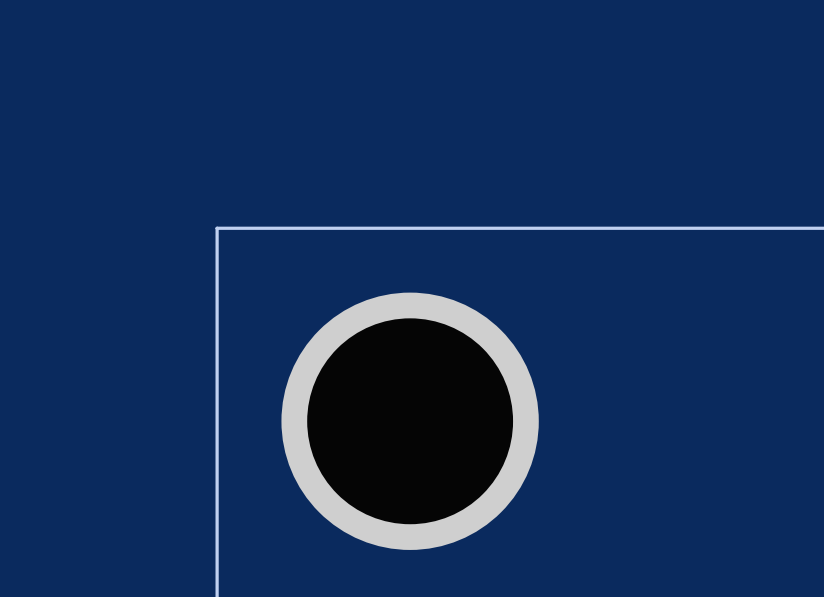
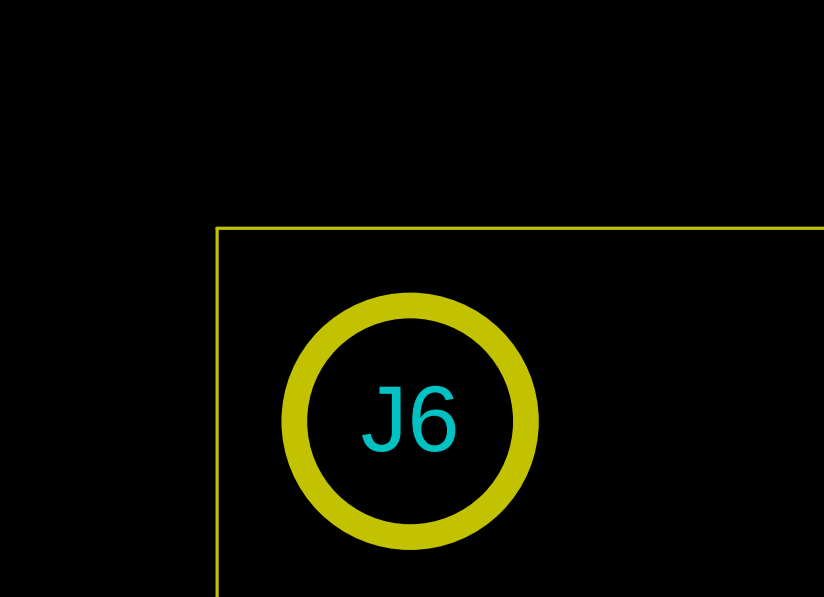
J6 name: none -> J6 (408, 418)

